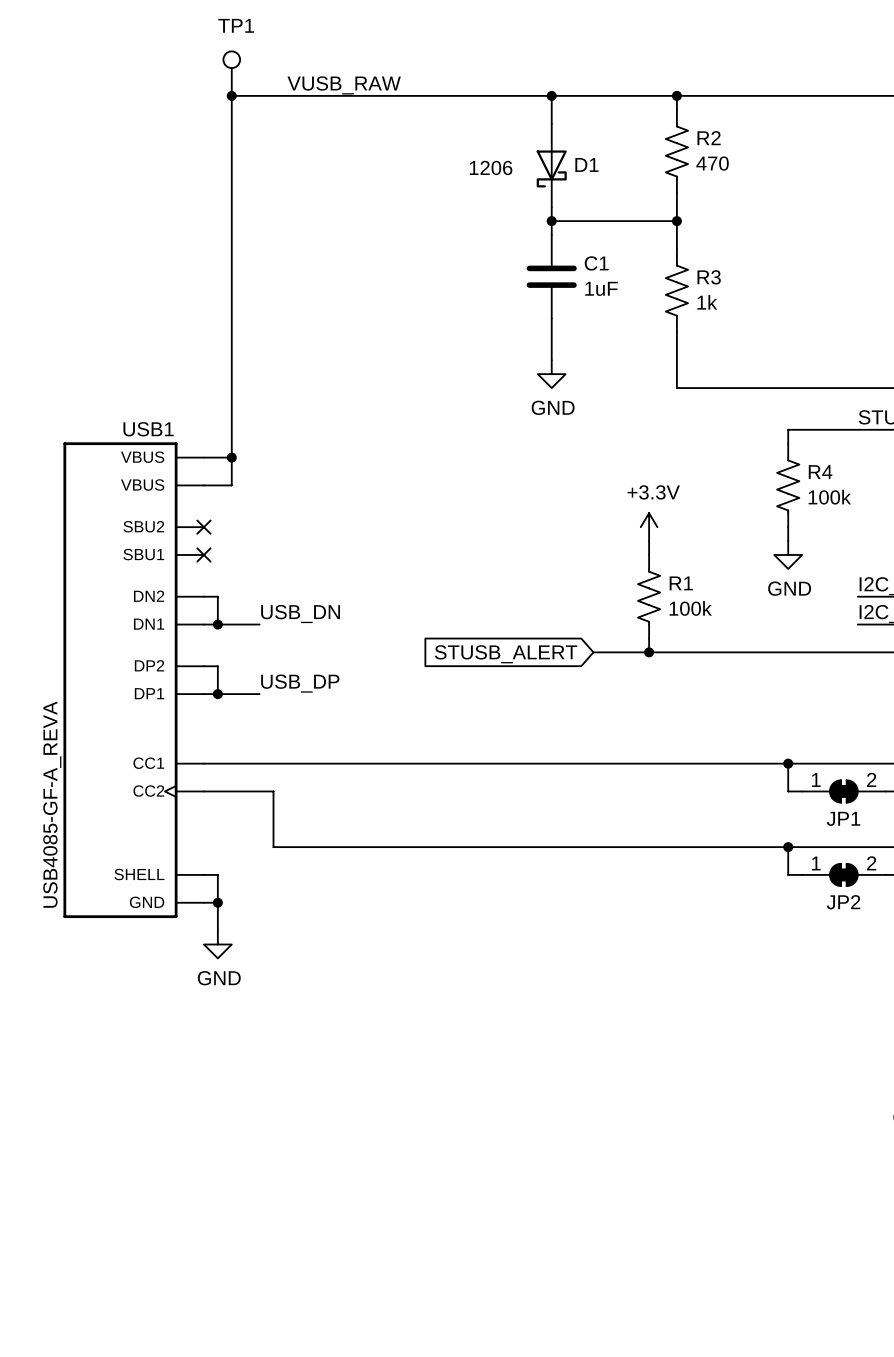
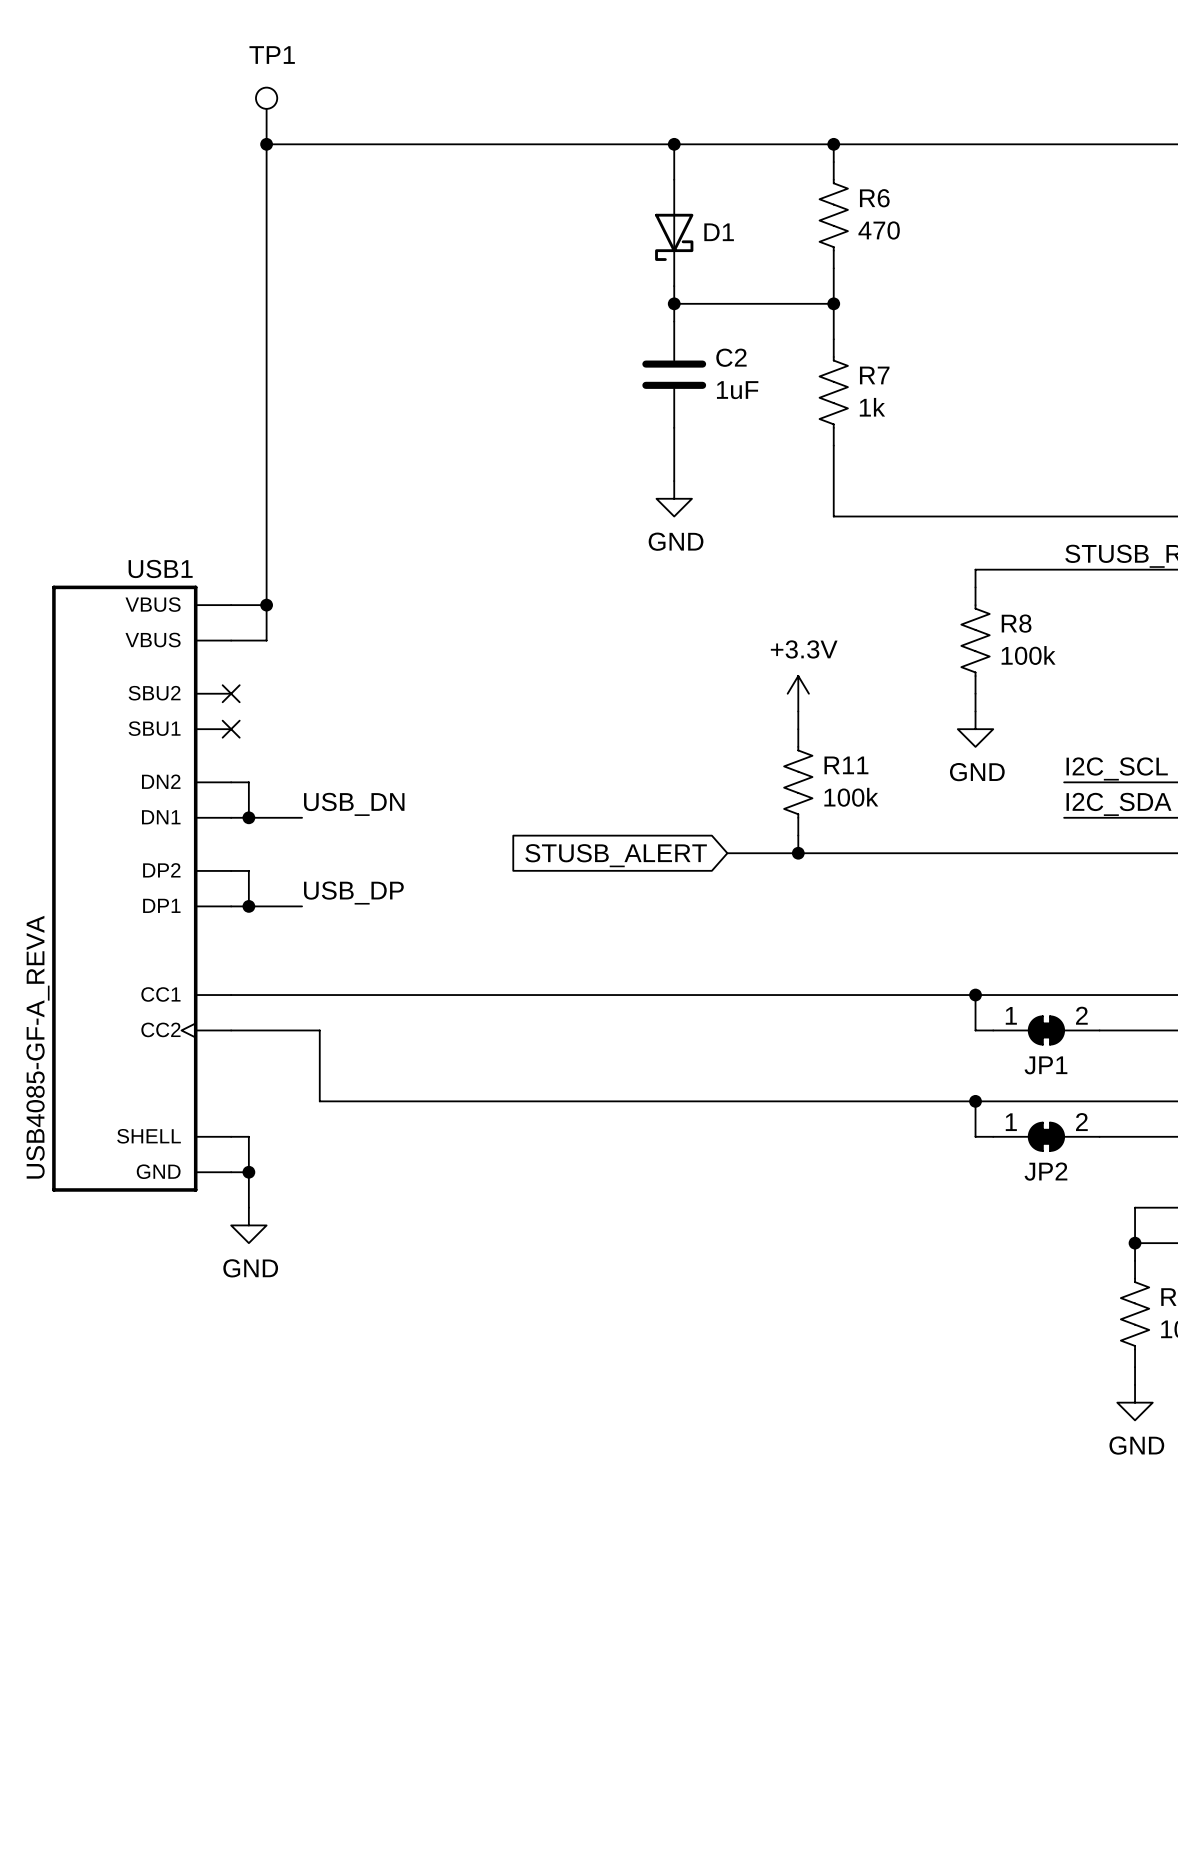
label: VUSB_RAW (344, 85) -> none
R2 name: R2 (709, 138) -> R6 (874, 198)
text: 1206 (491, 167) -> none
C1 name: C1 (596, 263) -> C2 (731, 357)
R3 name: R3 (709, 277) -> R7 (874, 375)
R4 name: R4 (820, 472) -> R8 (1016, 623)
R1 name: R1 (681, 583) -> R11 (846, 765)

